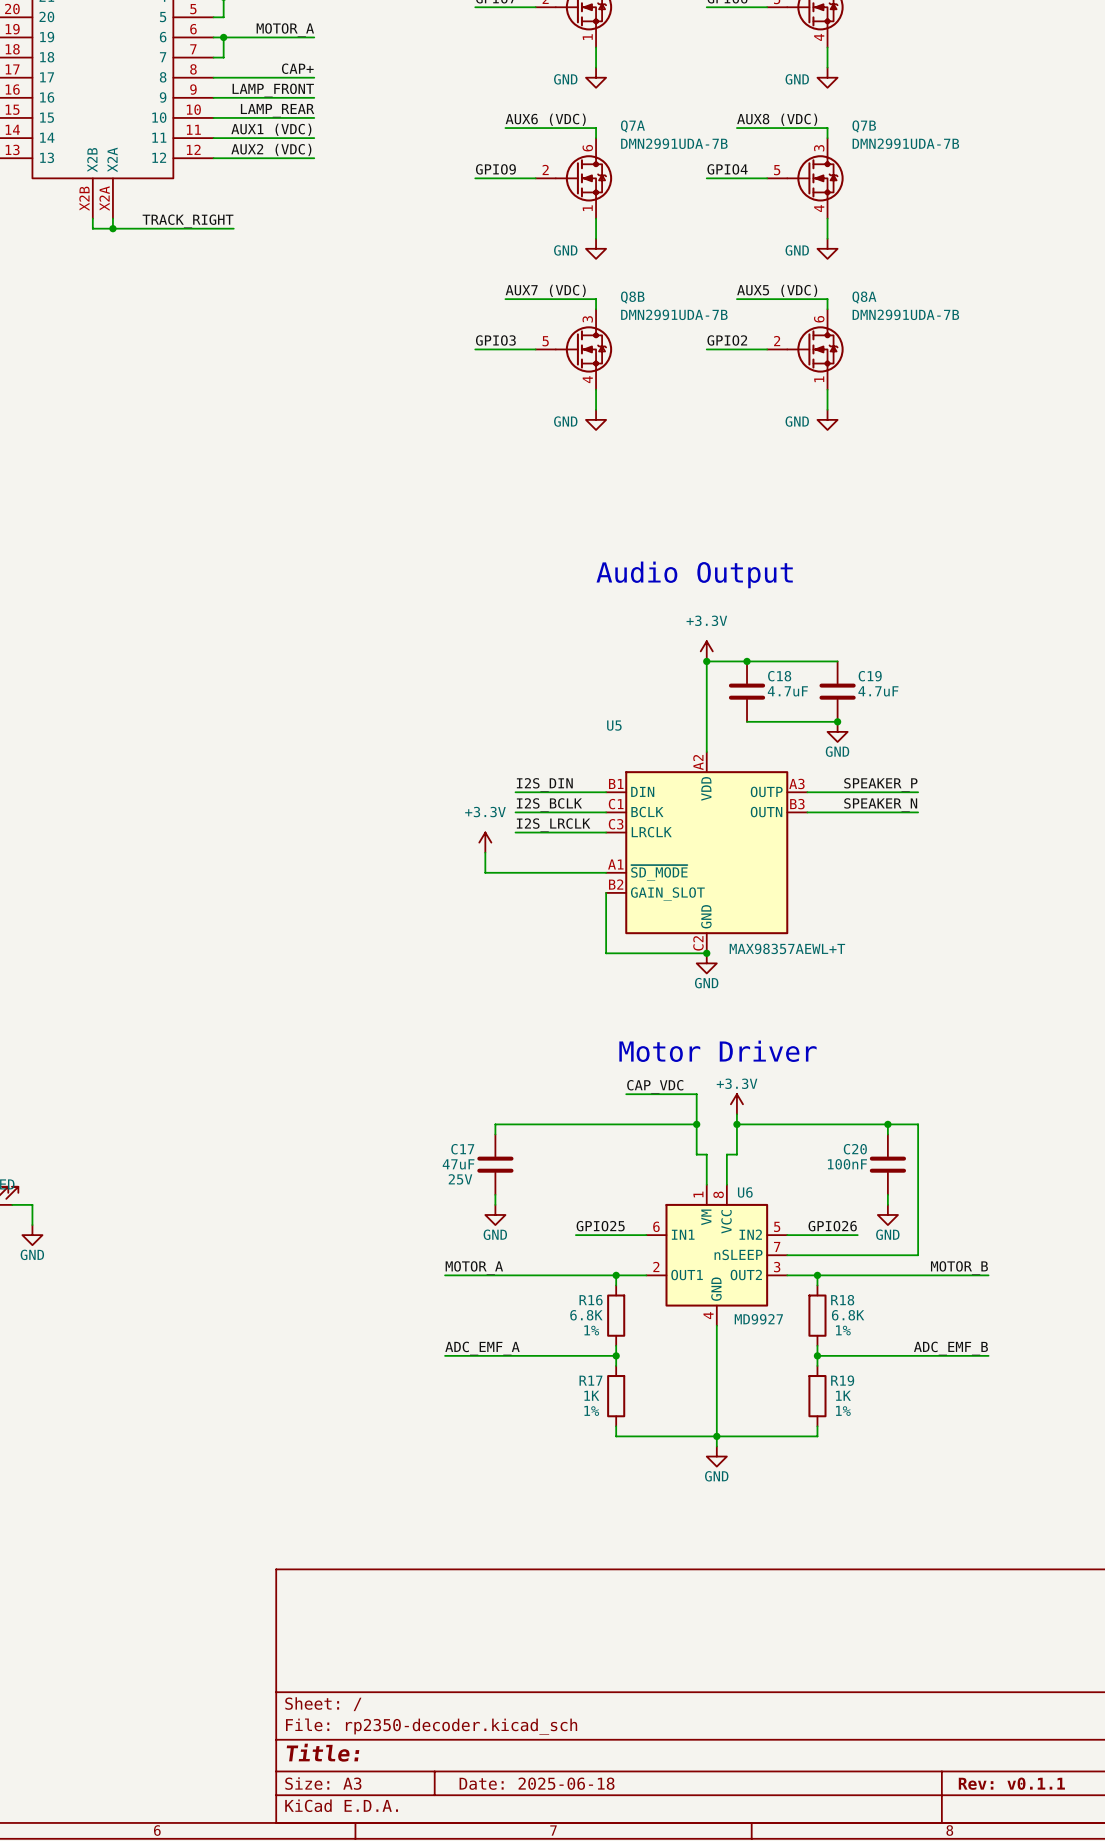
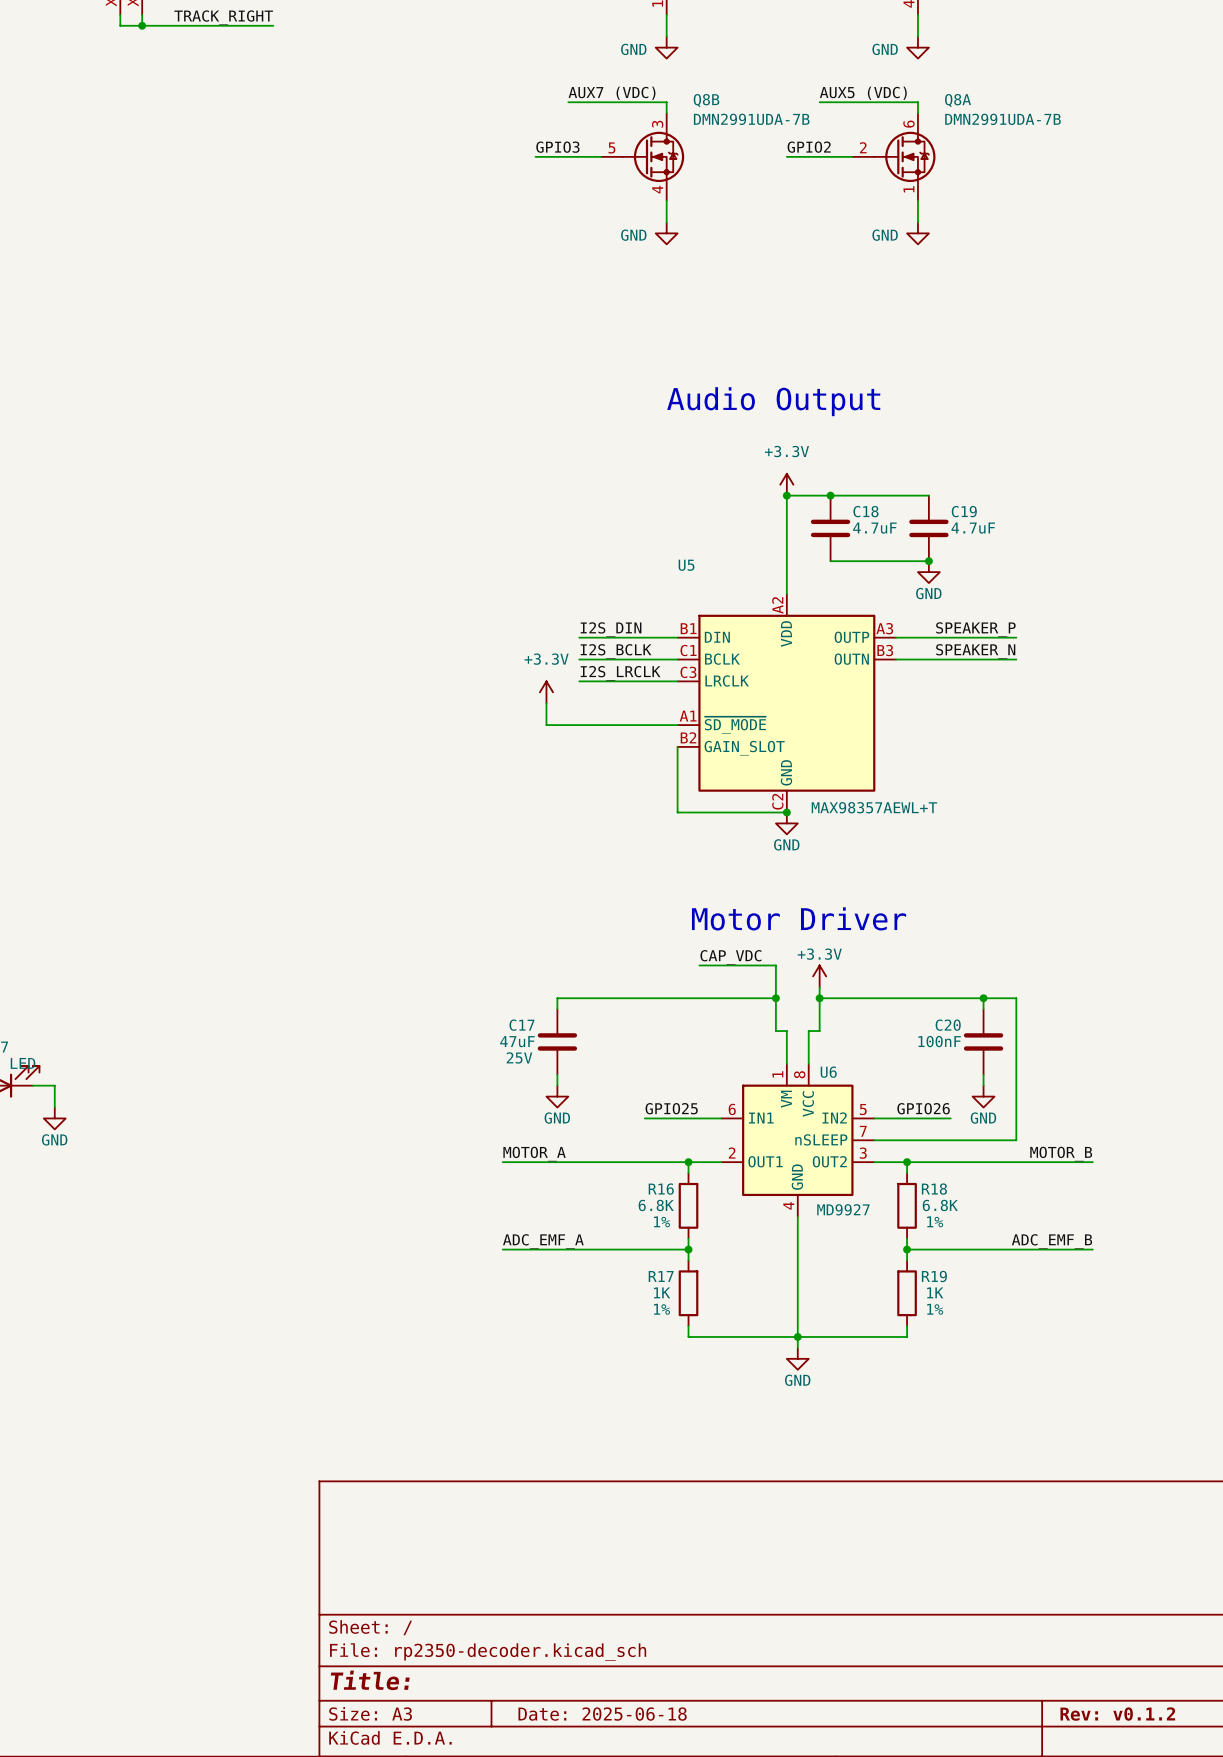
title block: Rev: v0.1.1 (1011, 1783) -> Rev: v0.1.2 (1117, 1714)

